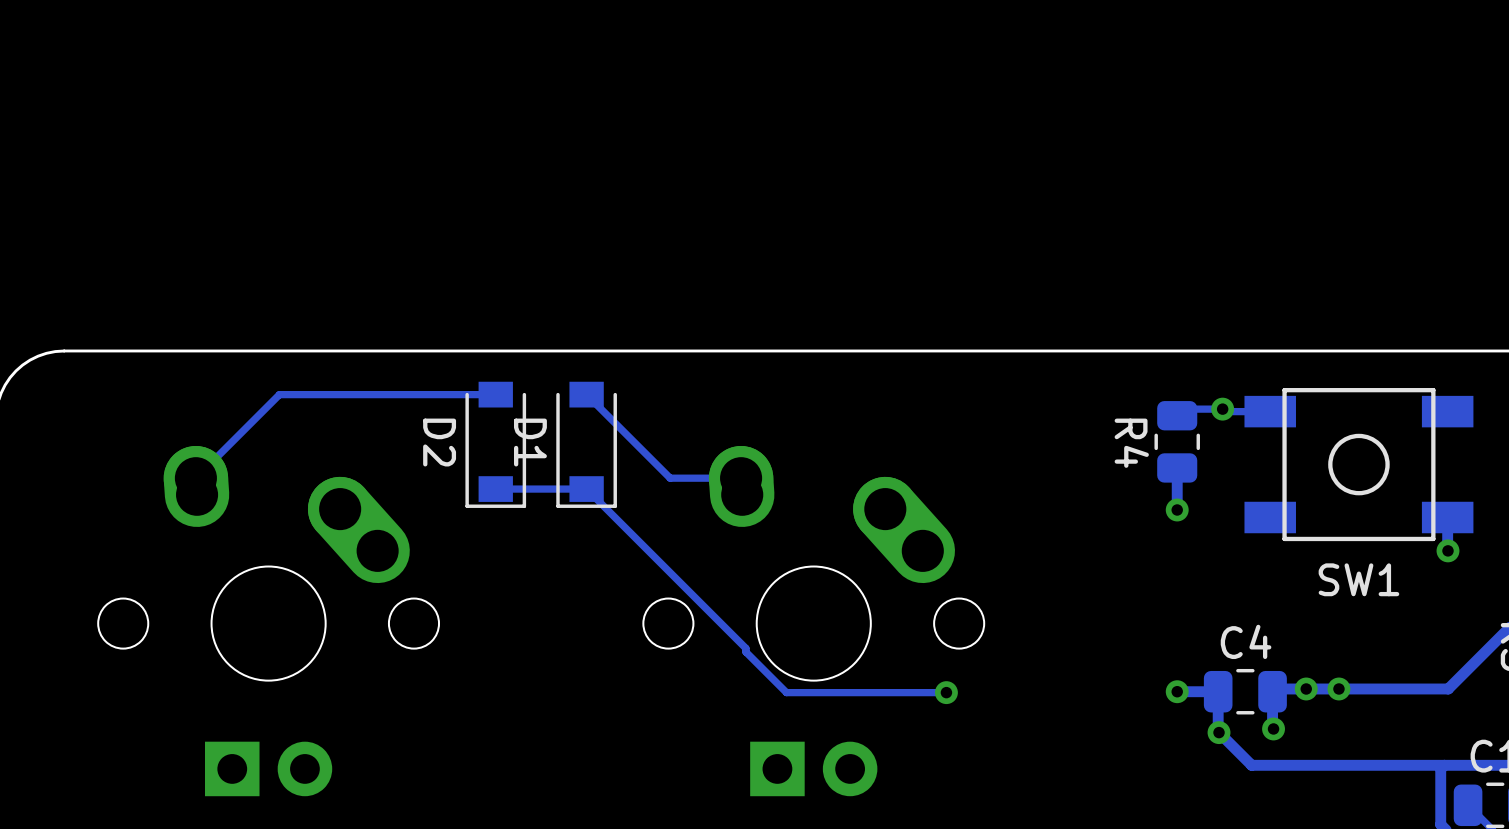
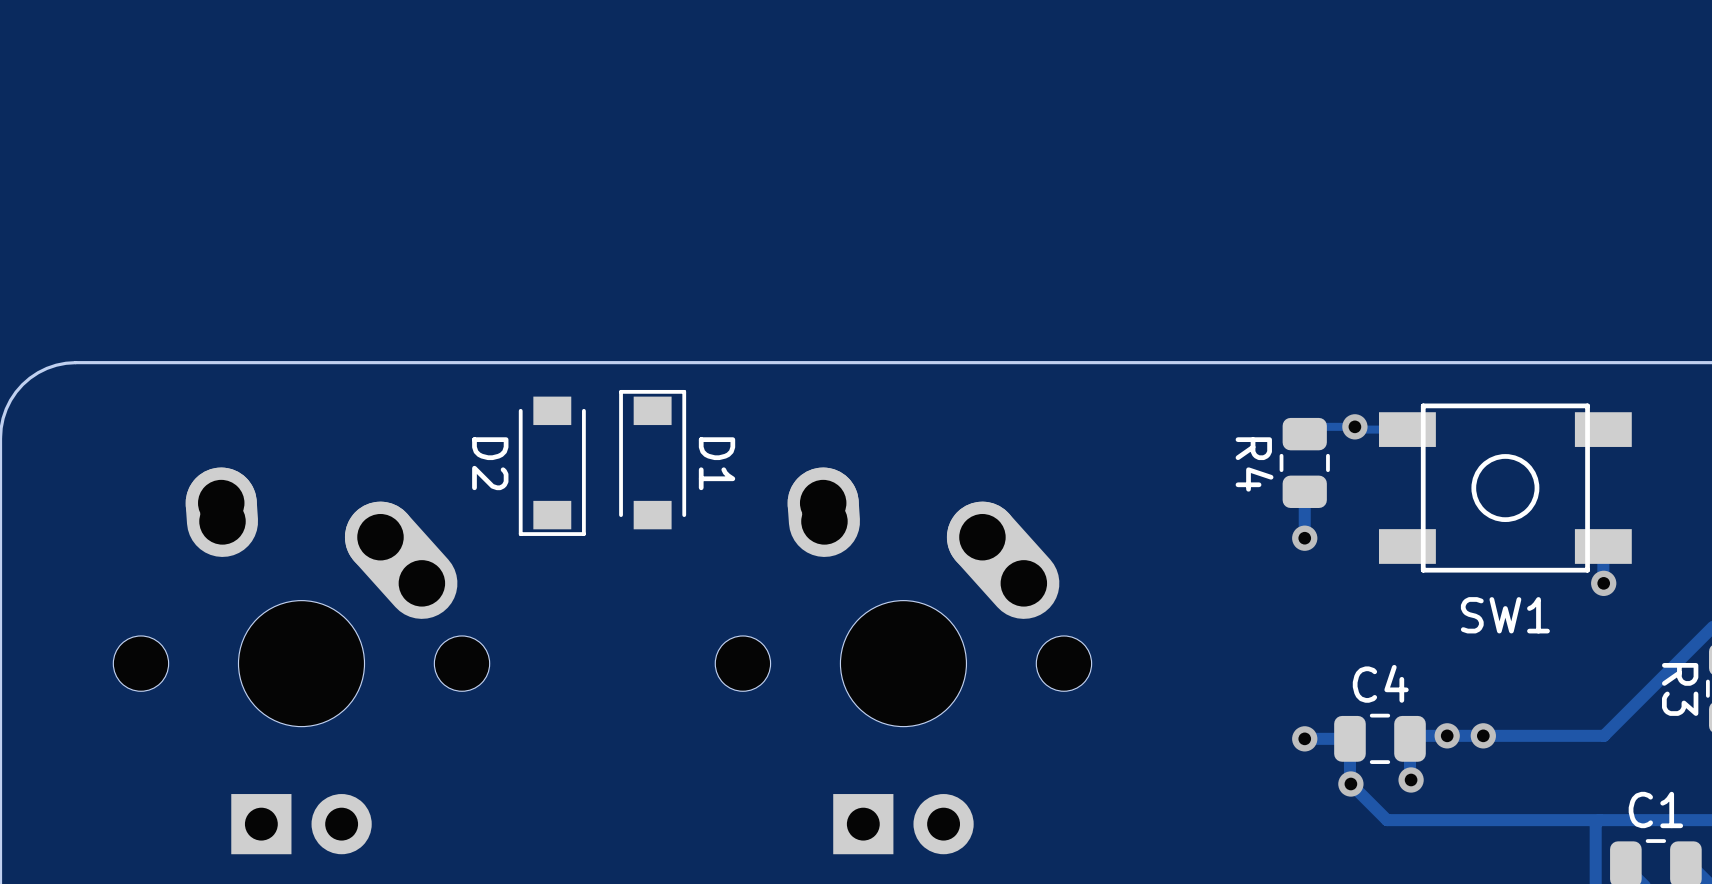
track: (495, 394) (279, 394) (195, 478) -> none
track: (586, 394) (670, 478) (741, 478) -> none
D1 rotation: 0° (586, 444) -> 180° (652, 459)
track: (495, 489) (586, 489) (745, 648) (745, 652) (786, 692) (946, 692) -> none
via: (946, 692) -> none

